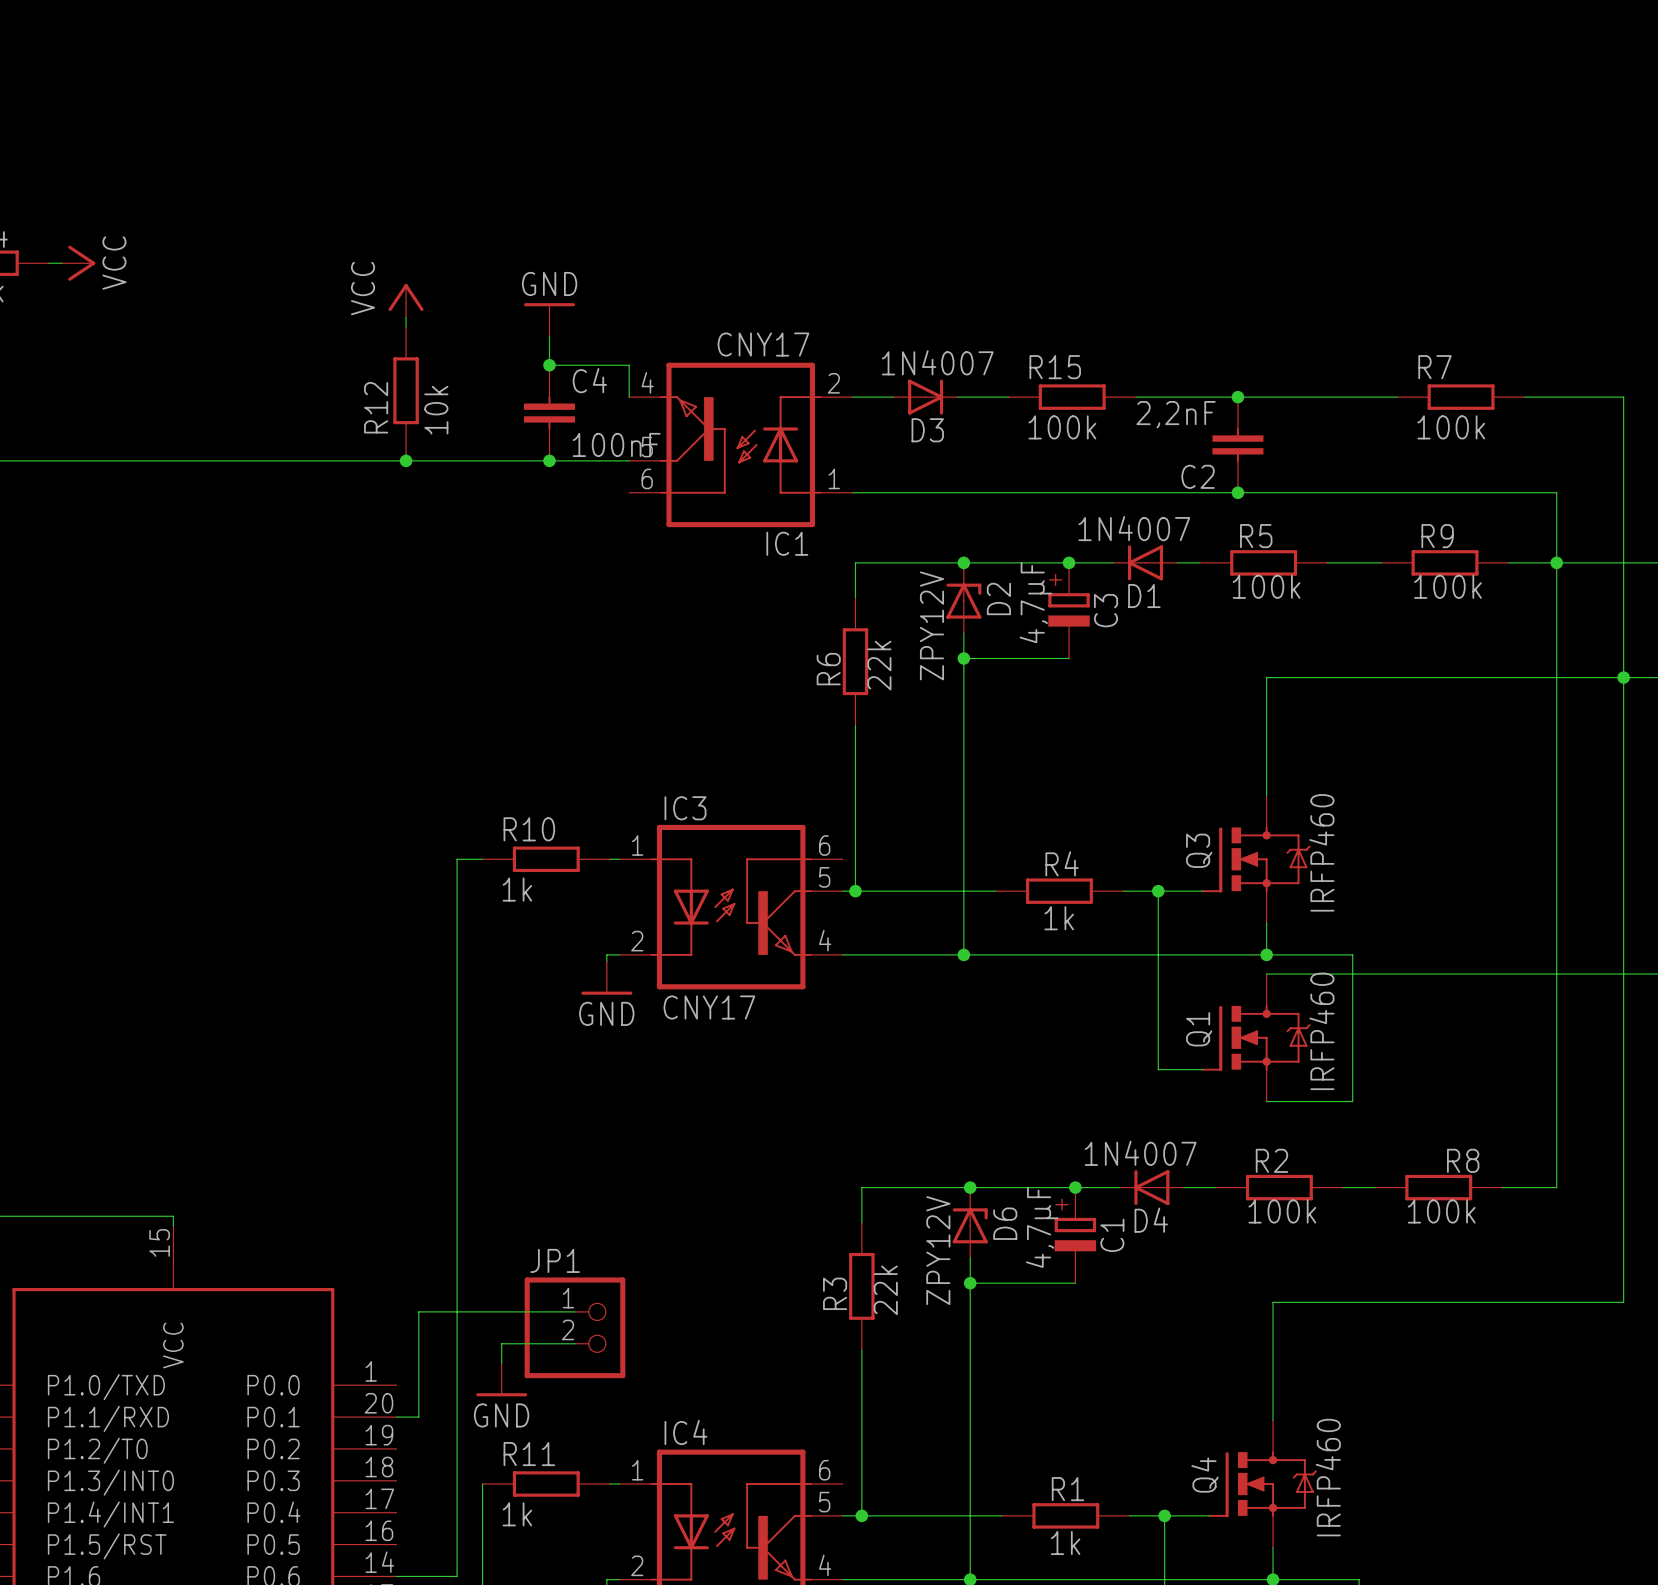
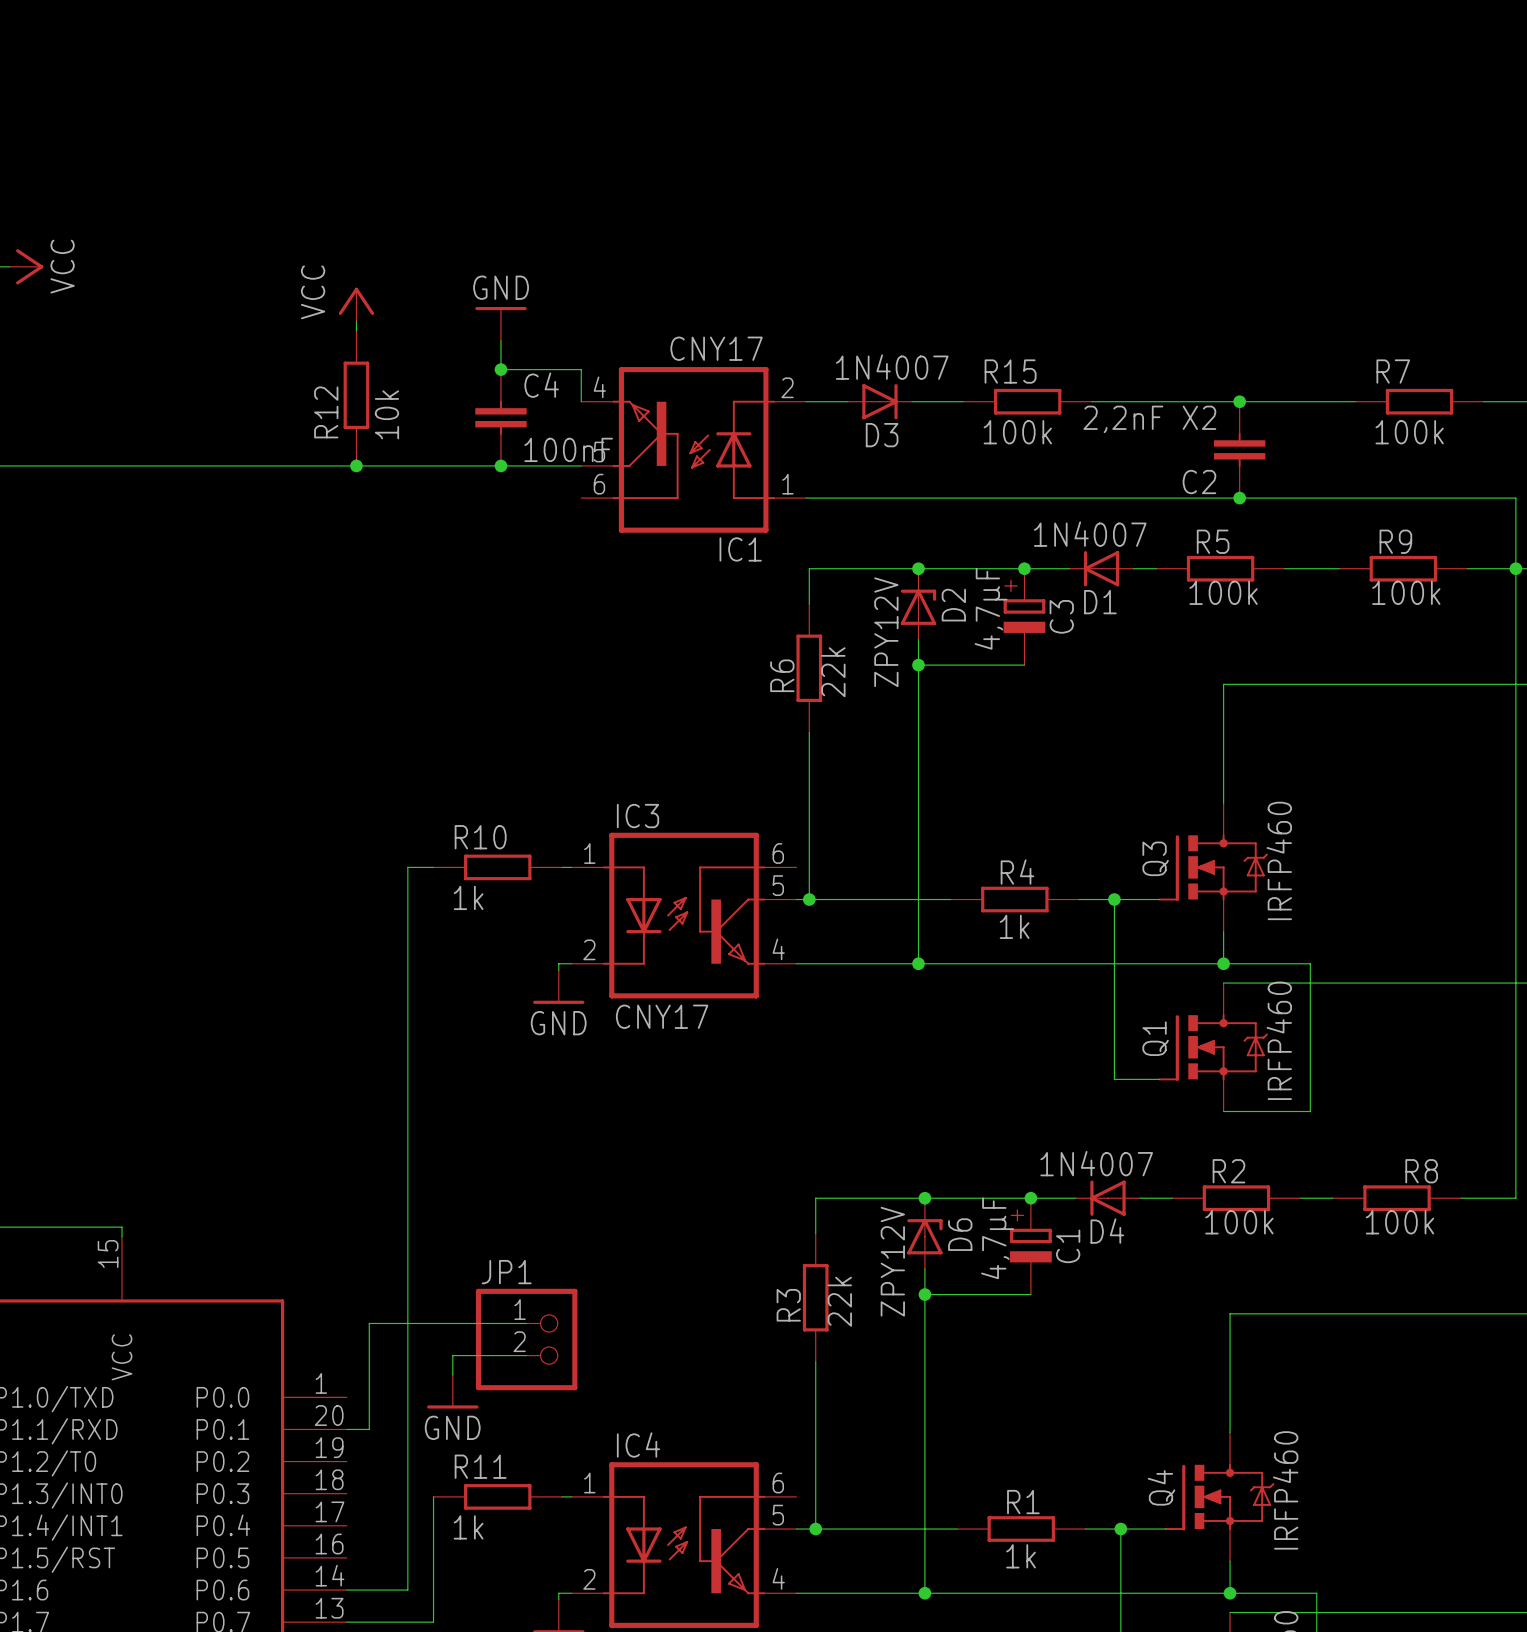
junction position: (1237, 397) -> (1239, 401)
C2 value: 2,2nF (1176, 414) -> 2,2nF X2 (1149, 419)
C2 position: (1237, 444) -> (1239, 449)
junction position: (1237, 492) -> (1239, 498)

